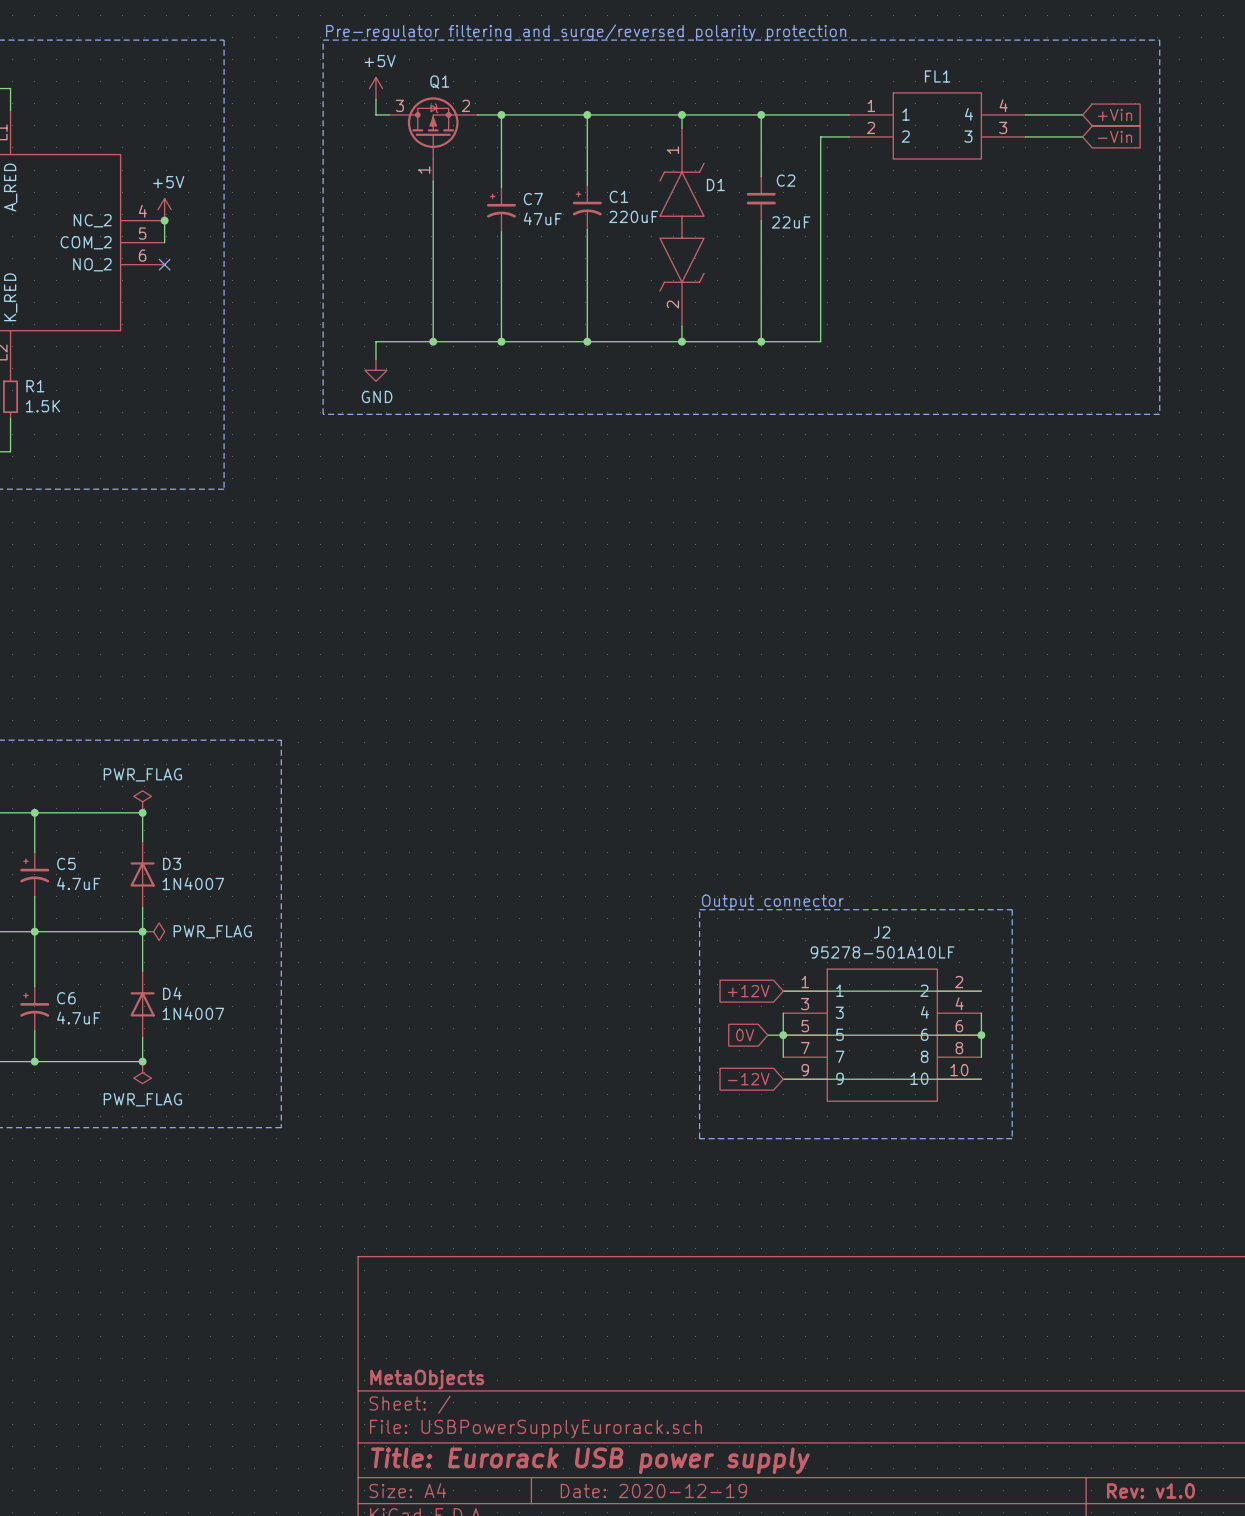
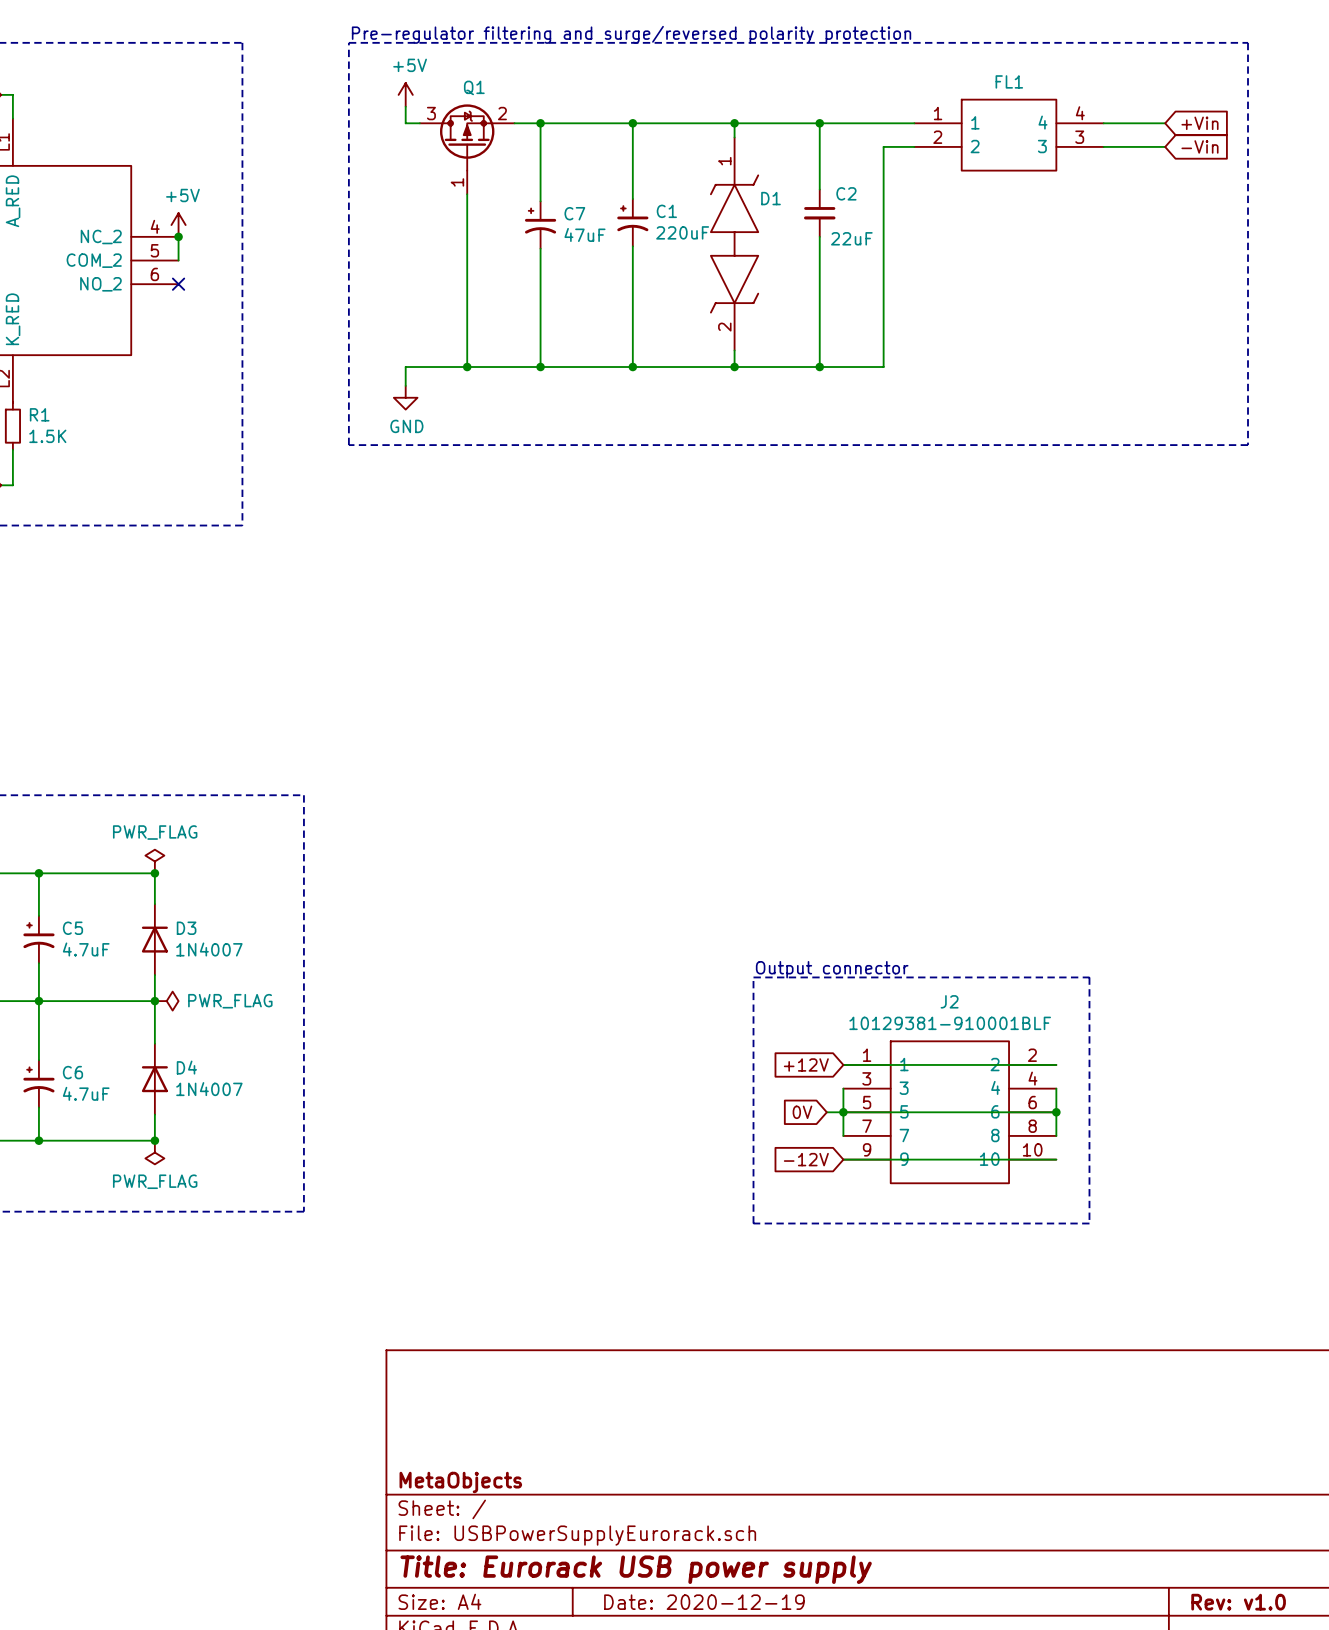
J2 value: 95278-501A10LF (882, 952) -> 10129381-910001BLF (950, 1023)

